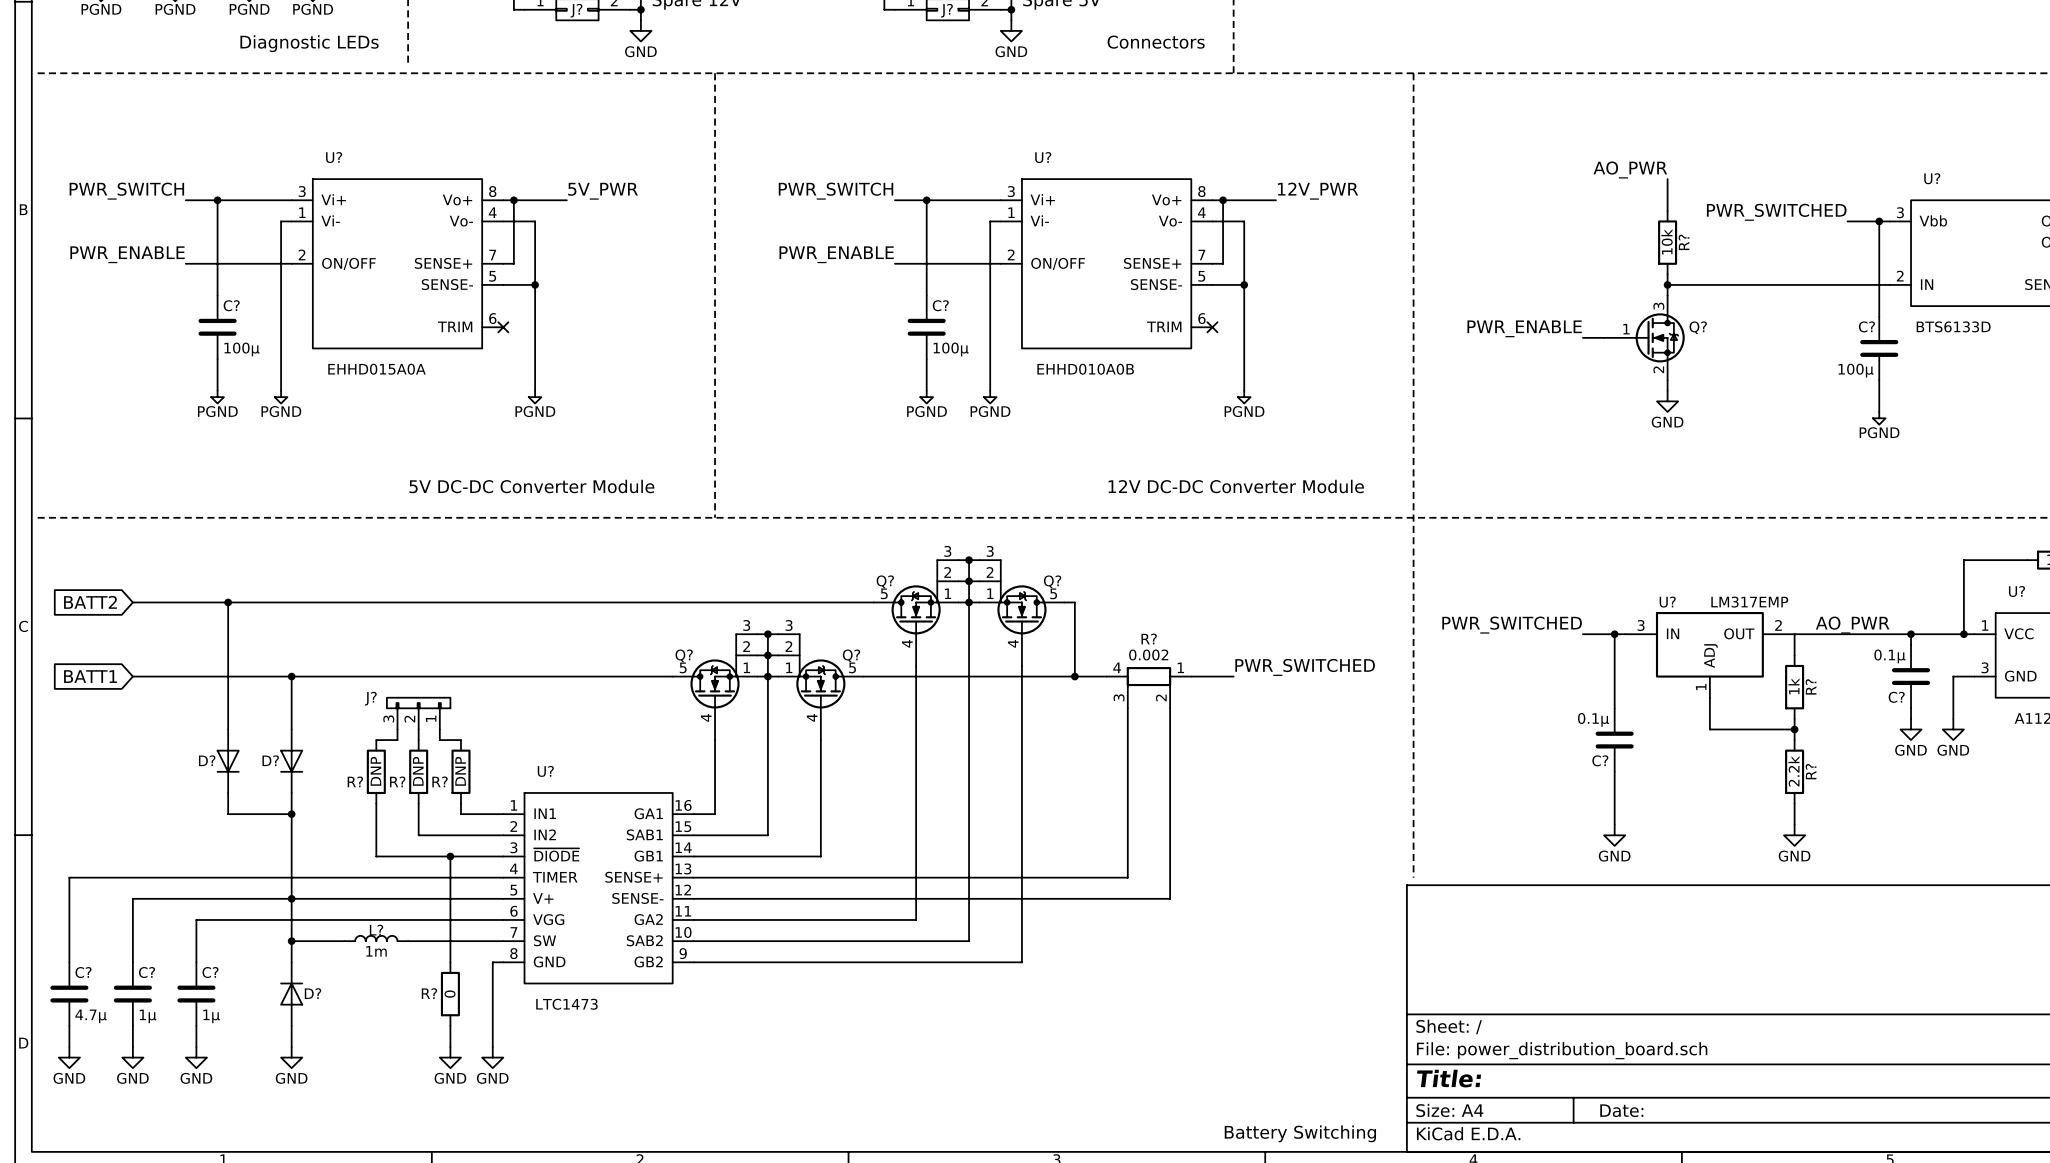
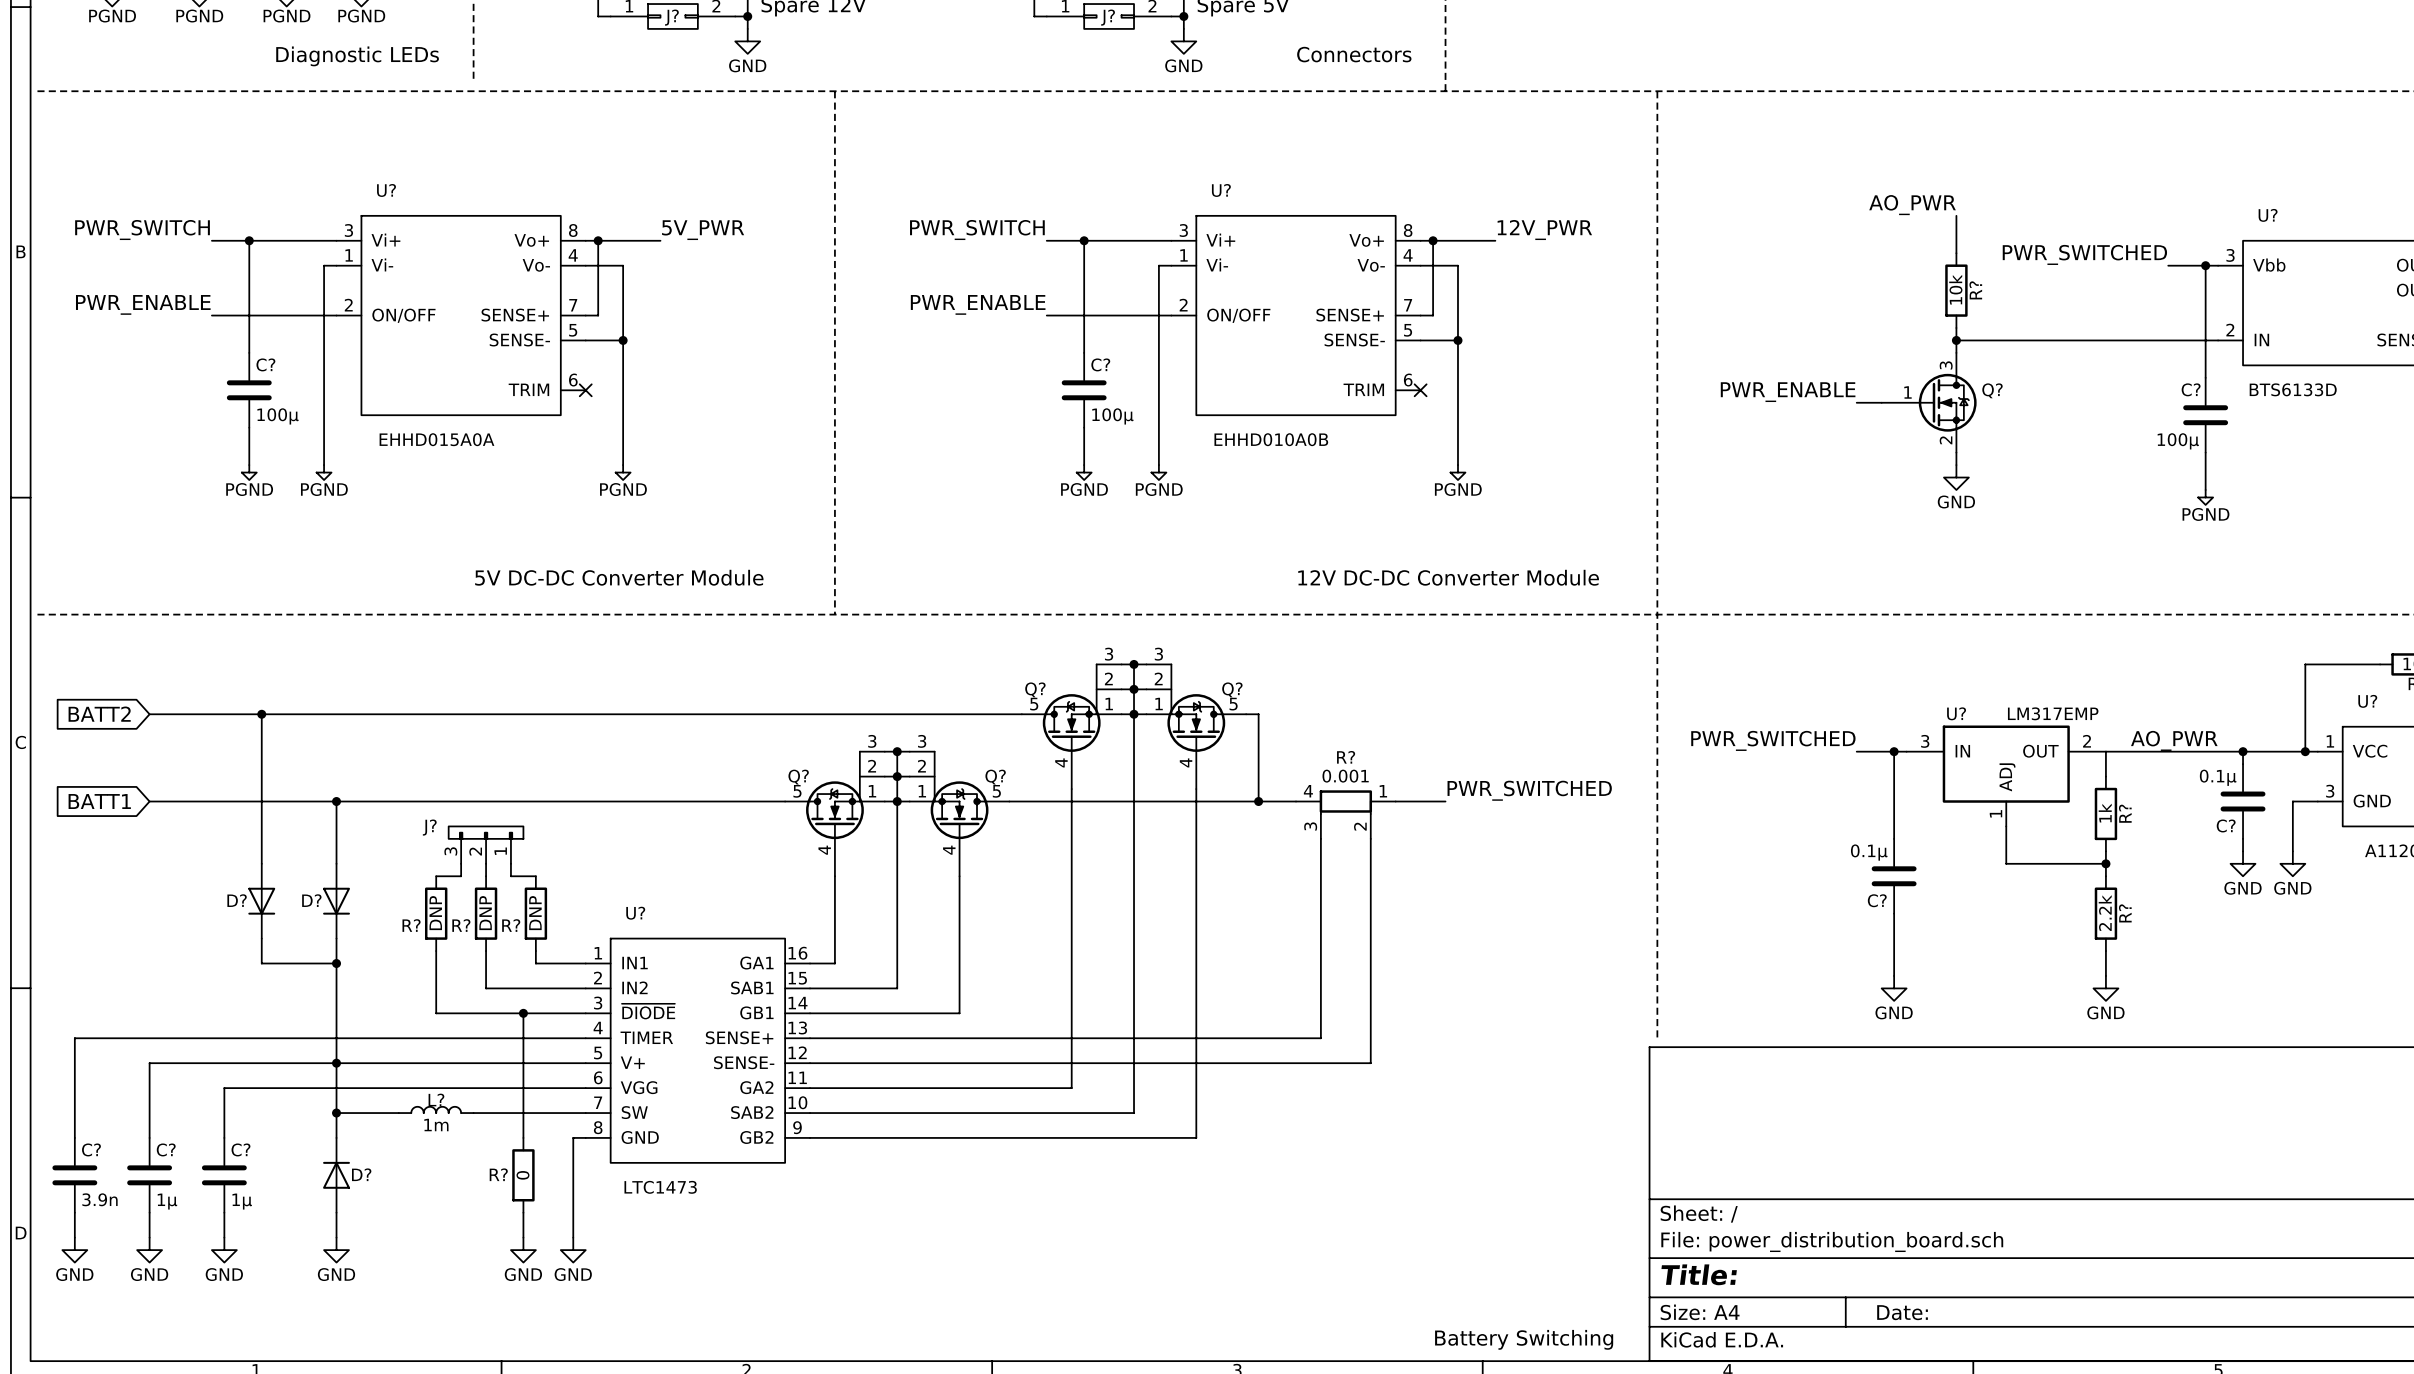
R? value: 0.002 (1148, 655) -> 0.001 (1345, 776)
C? value: 4.7μ (91, 1016) -> 3.9n (100, 1199)

